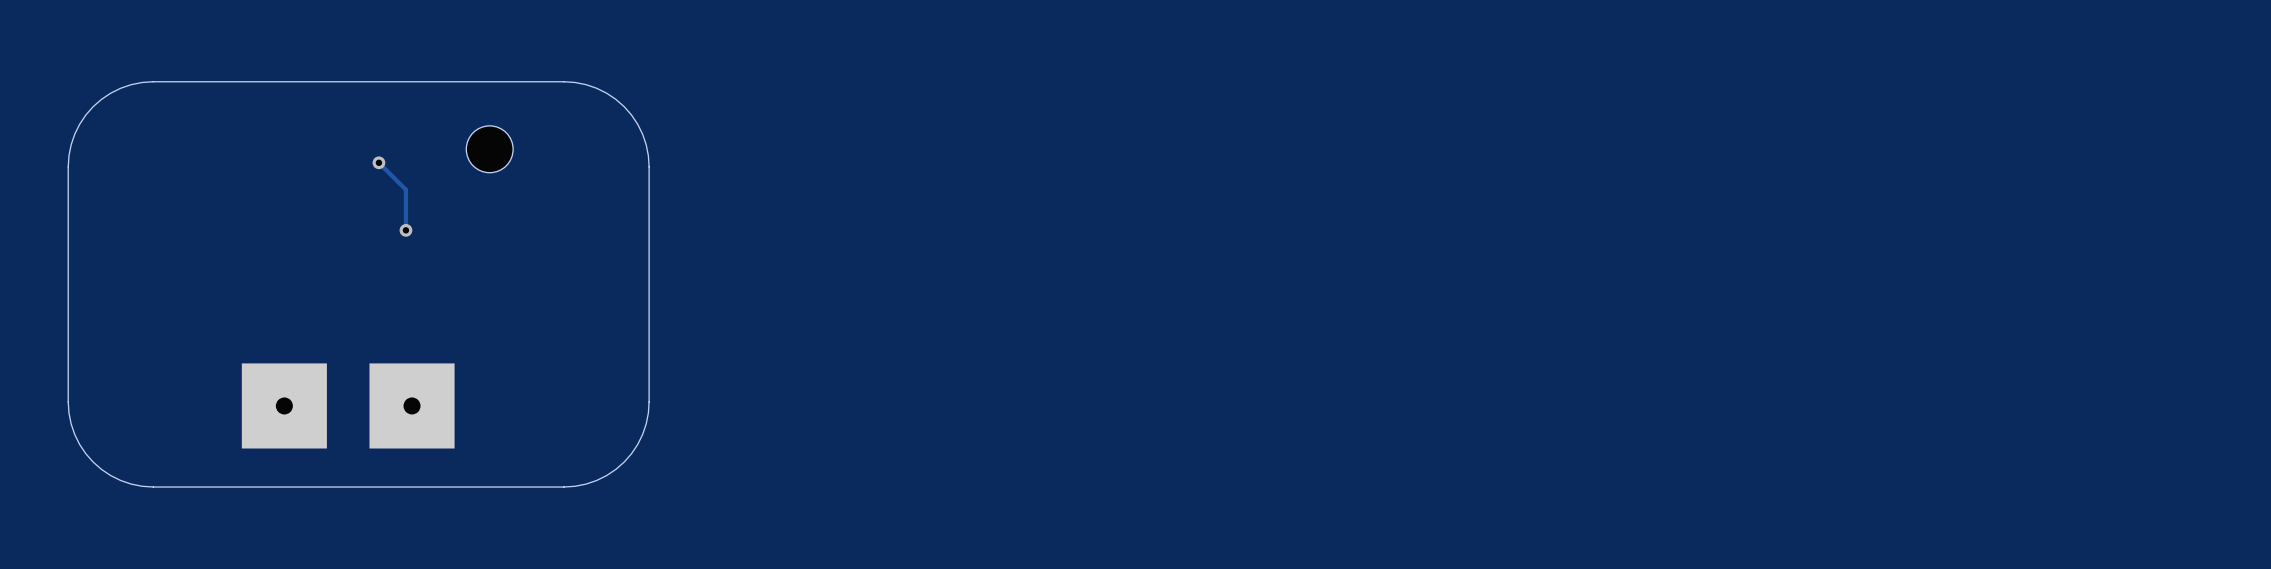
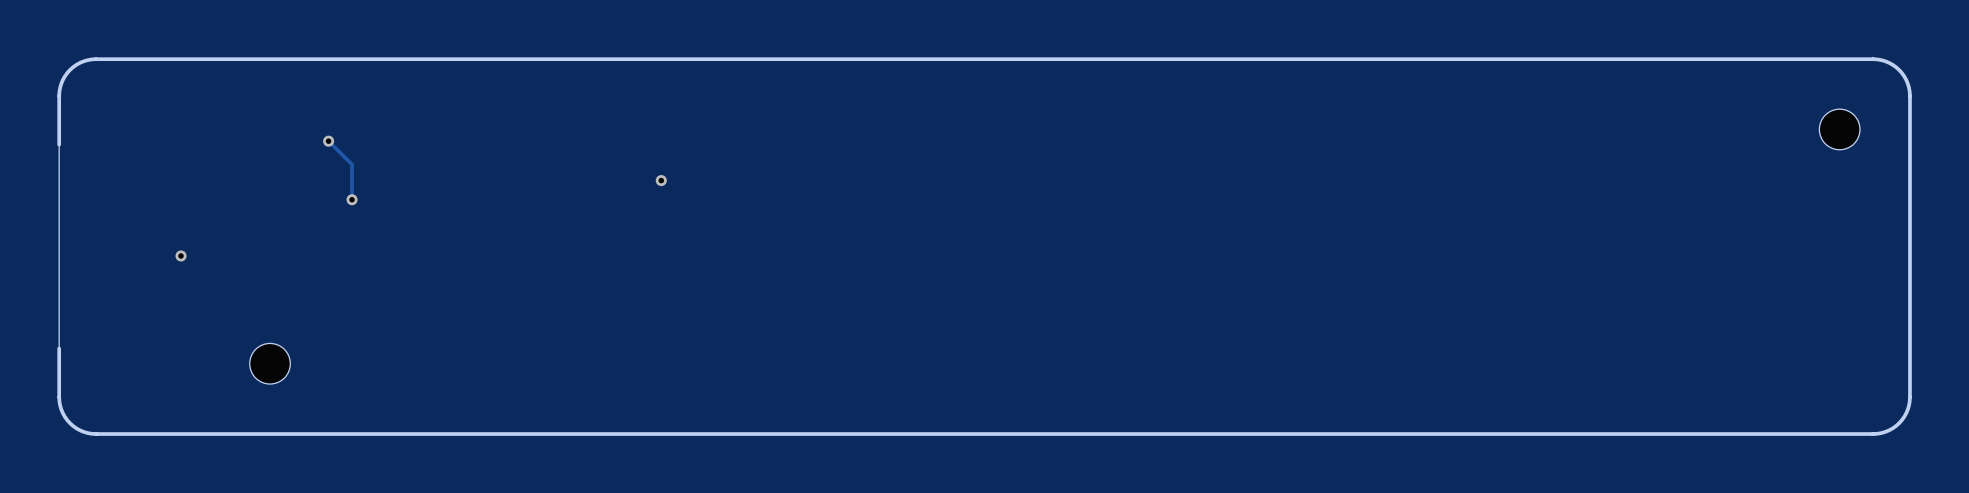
part position: (489, 149) -> (270, 363)
part: none -> (1839, 129)
board edge: (68, 166) (74, 134) (93, 106) (120, 88) (153, 81) (575, 82) (606, 93) (631, 115) (646, 144) (649, 166) (648, 413) (642, 434) (631, 453) (615, 469) (596, 480) (564, 487) (142, 486) (110, 475) (93, 462) (74, 434) (68, 401) -> (59, 144) (59, 91) (62, 80) (76, 64) (96, 59) (1873, 59) (1889, 62) (1899, 69) (1906, 80) (1909, 96) (1909, 401) (1906, 413) (1899, 423) (1889, 430) (1877, 433) (96, 434) (76, 428) (62, 413) (59, 401) (59, 348)
via: none -> (661, 180)
via: none -> (181, 255)
part: (348, 405) -> none

